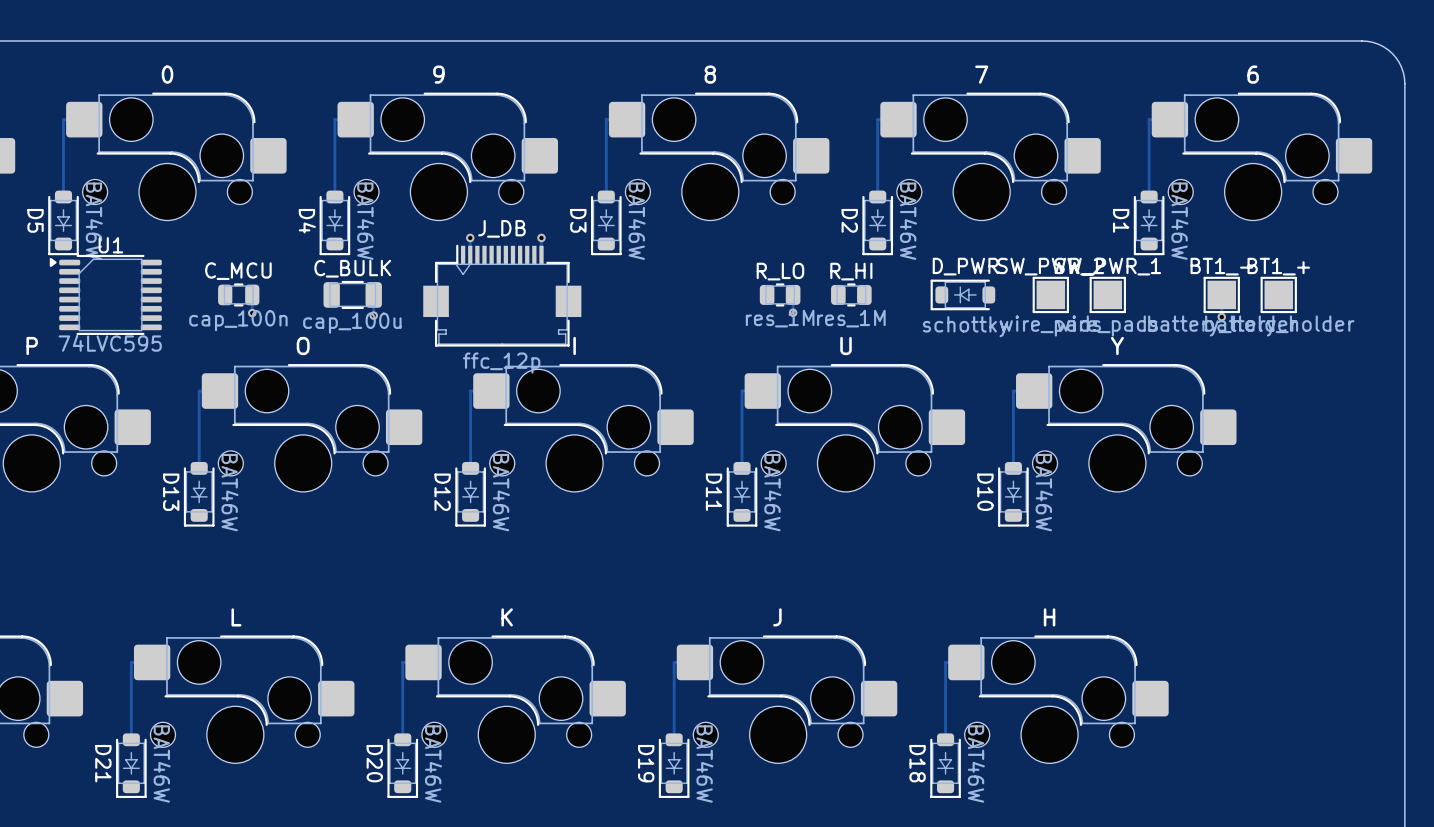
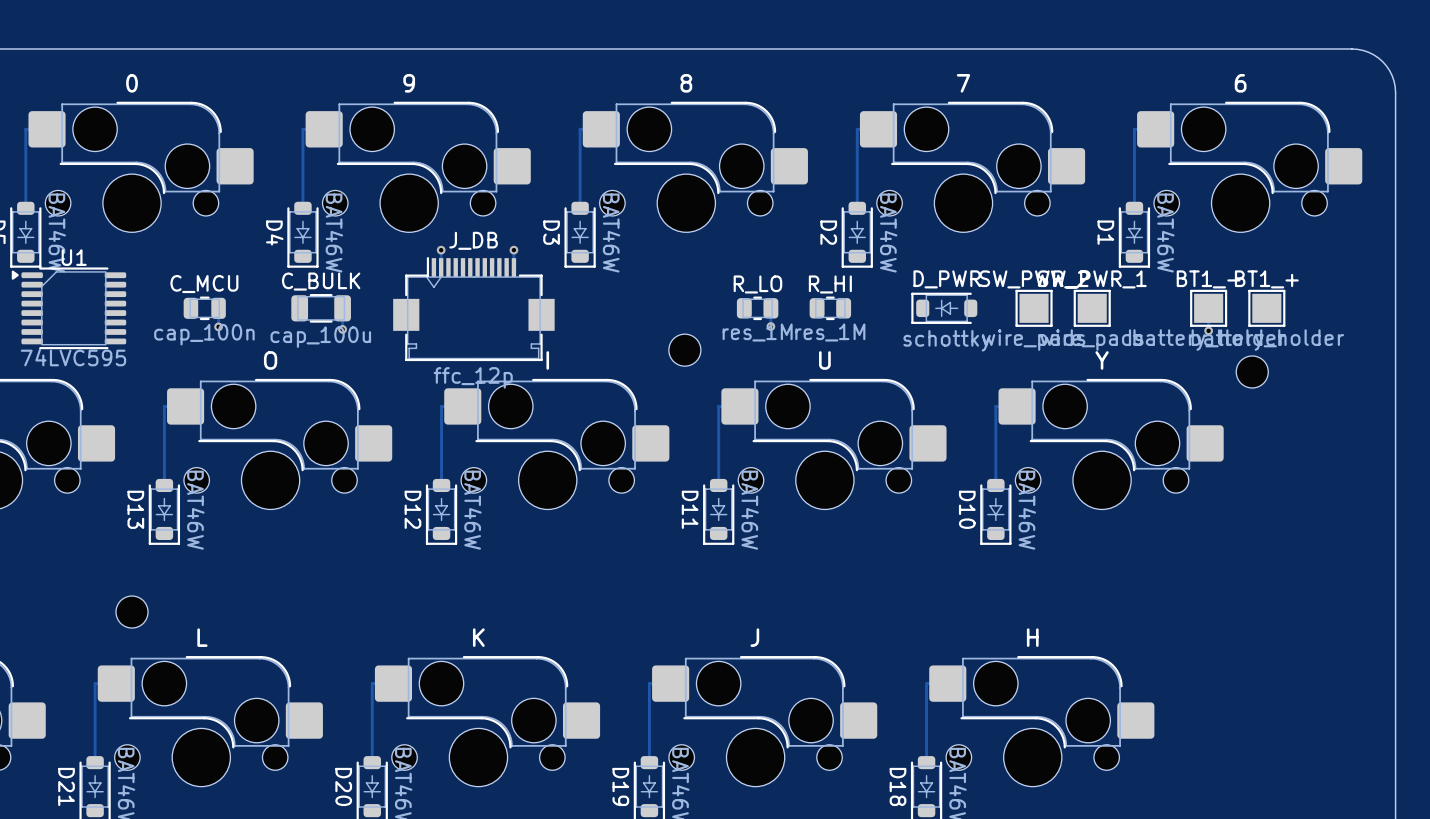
part: none -> (684, 350)
part: none -> (1252, 371)
part: none -> (132, 612)

